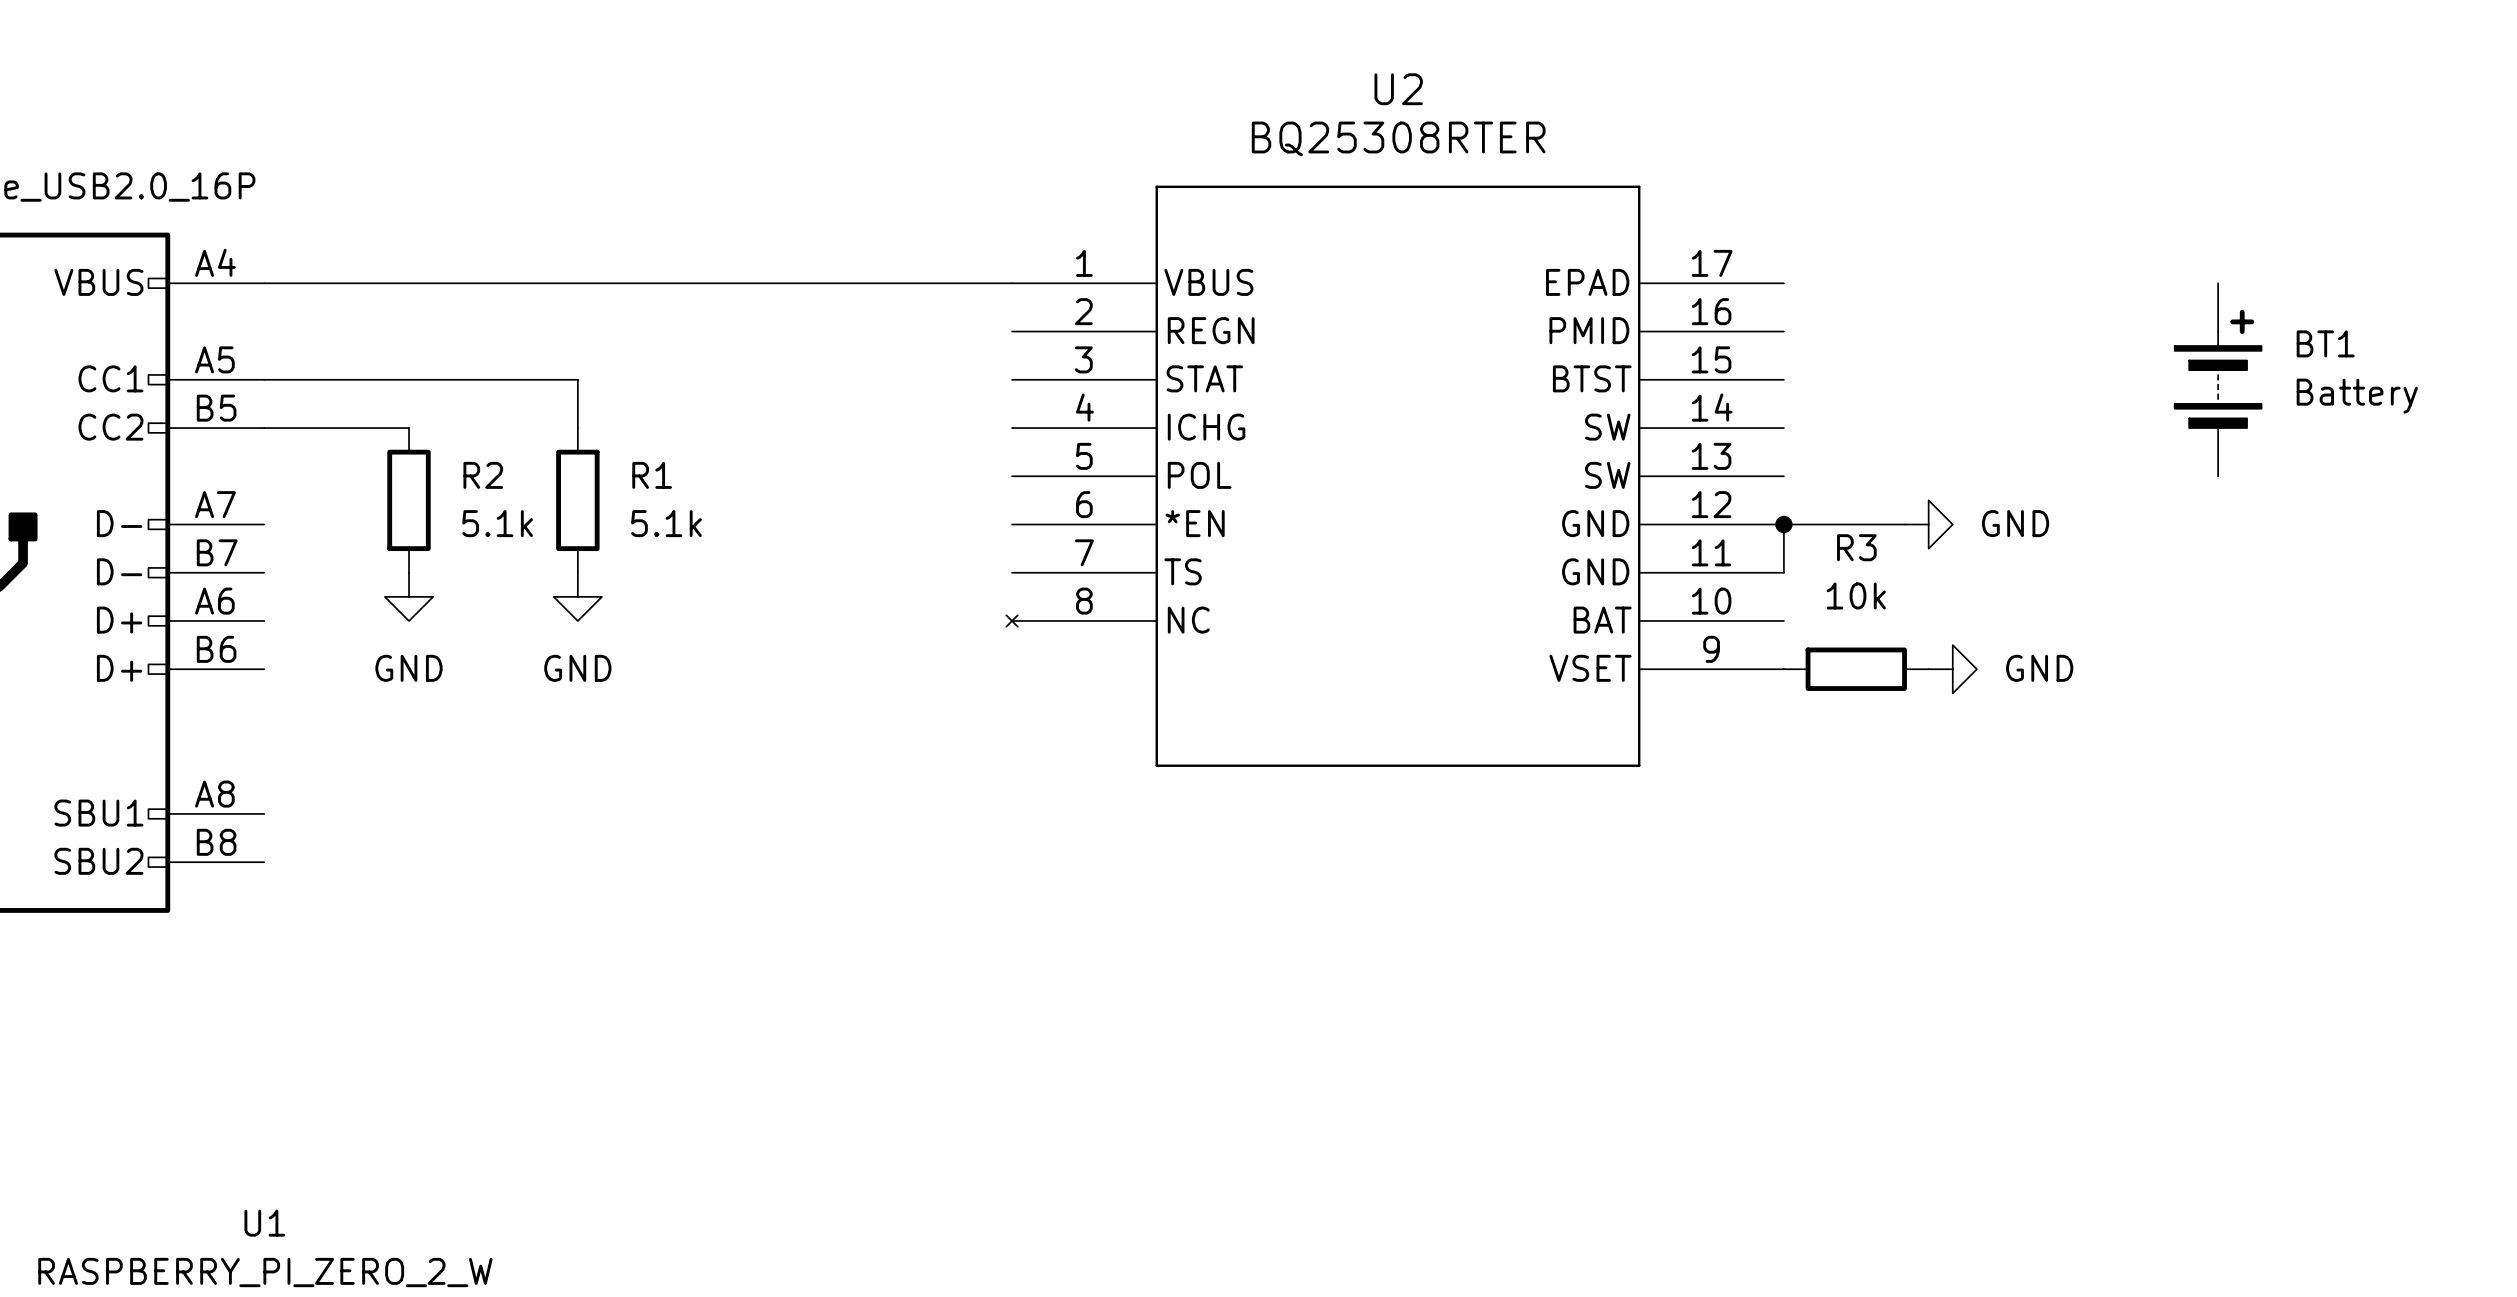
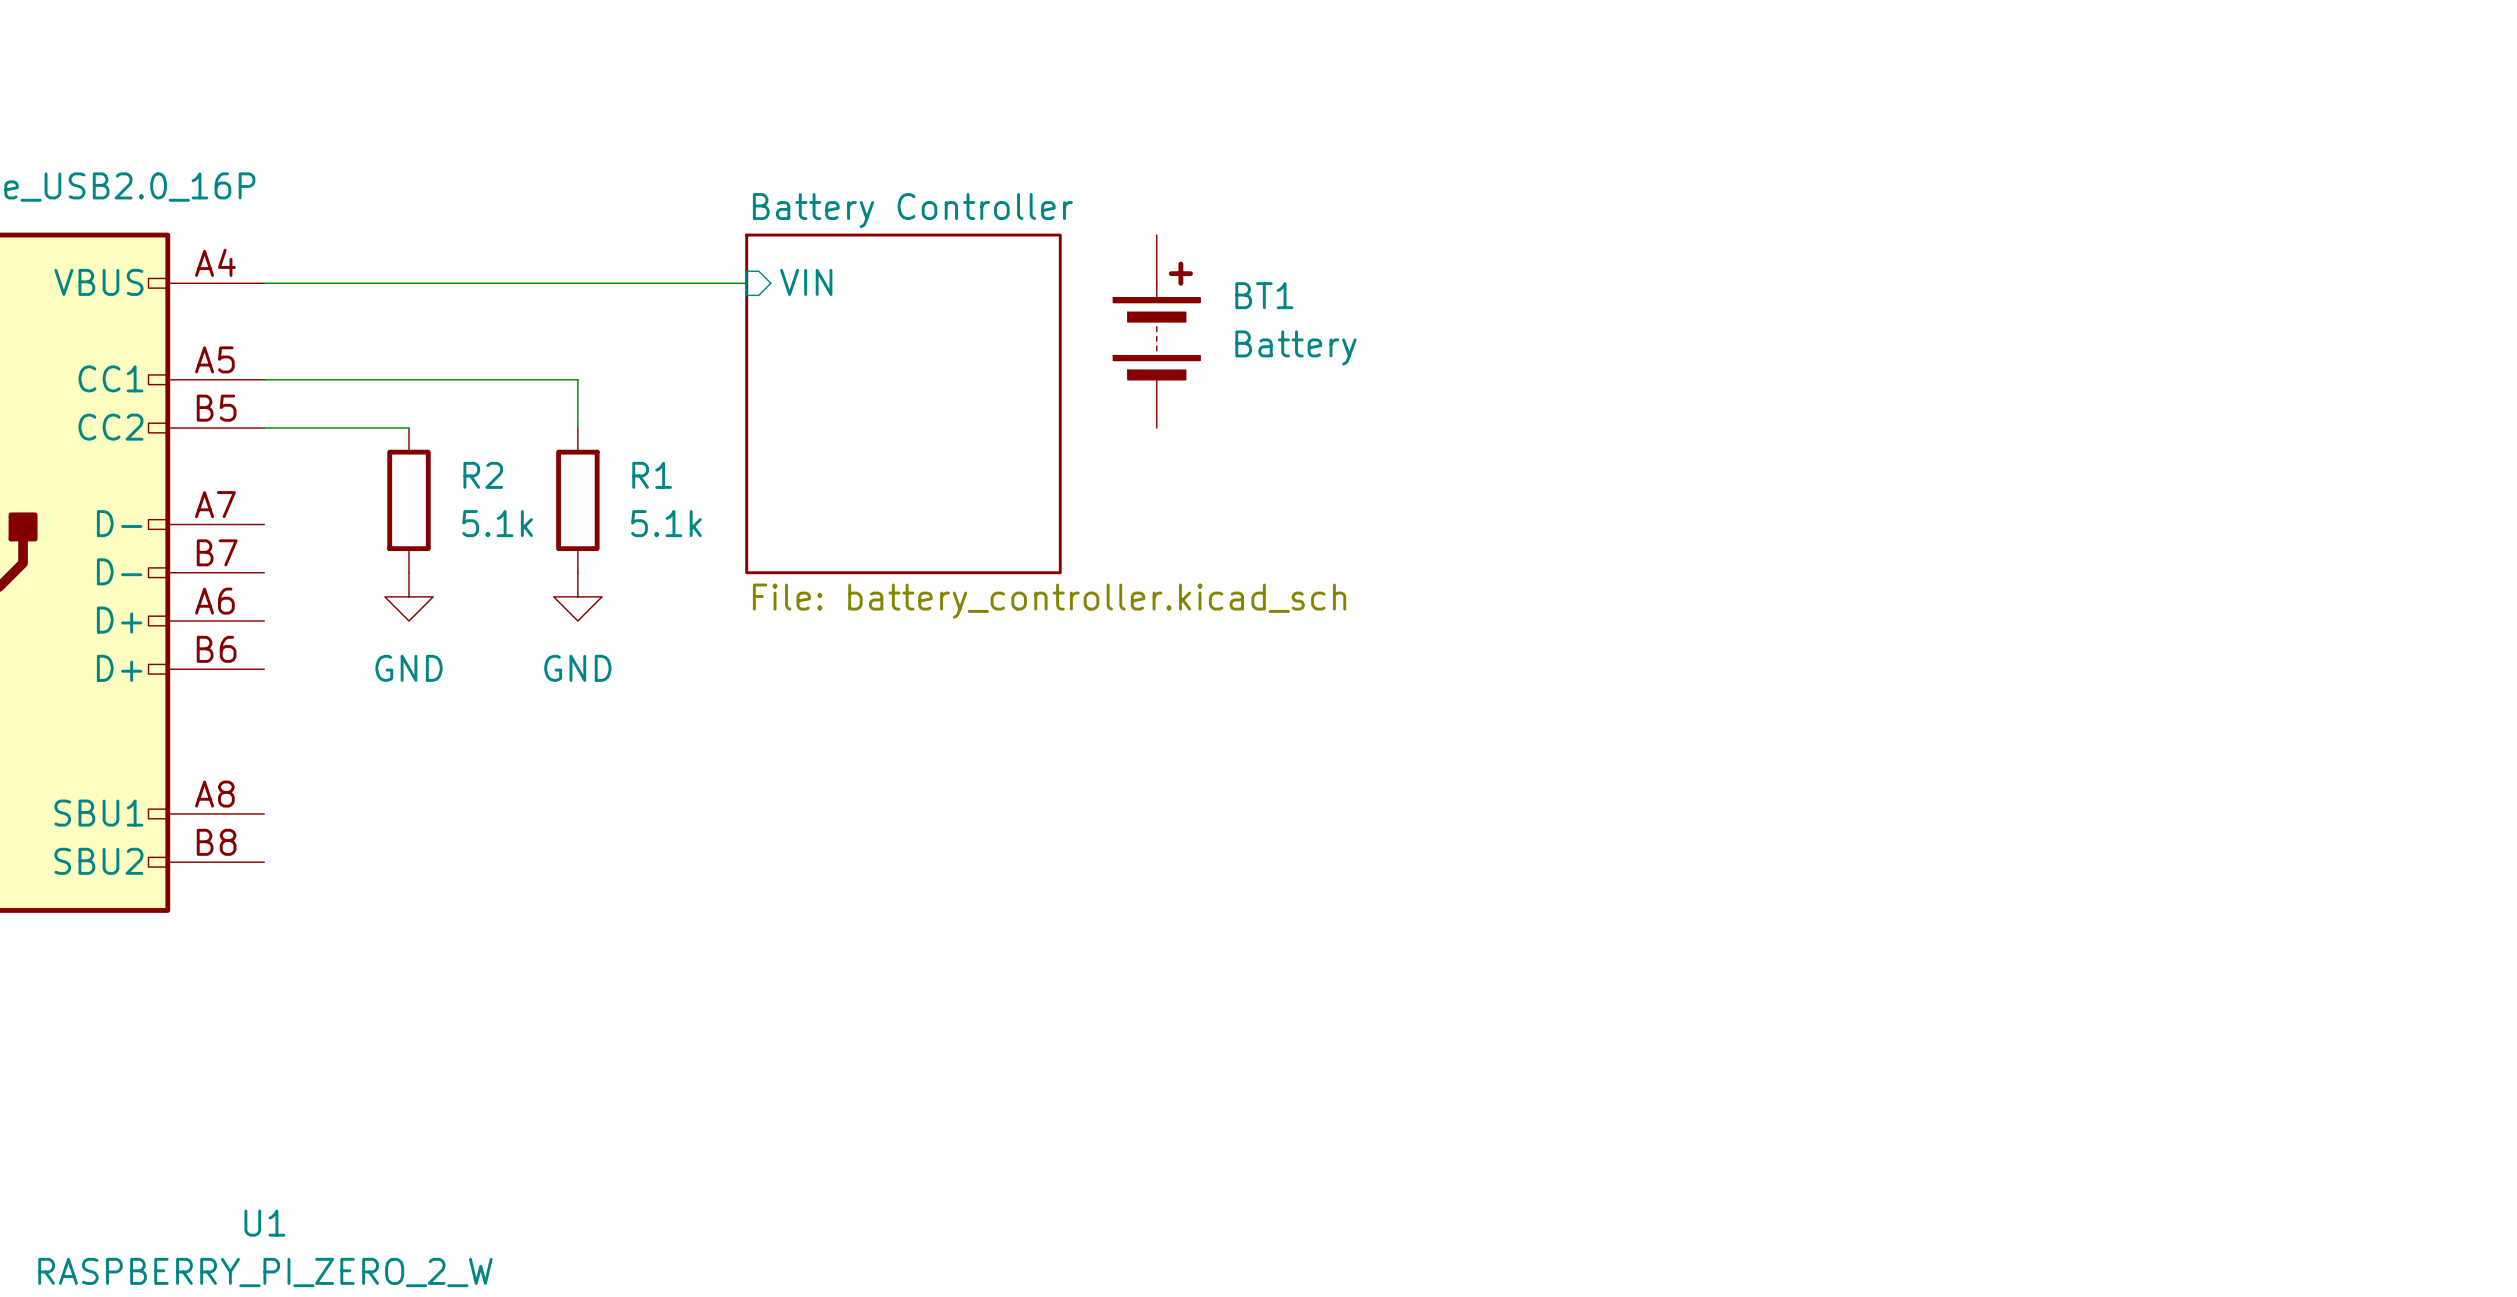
sheet pin: none -> VIN (806, 282)
wire: (746, 283) (1012, 283) -> none
BT1 position: (2218, 379) -> (1156, 331)
sheet Battery Controller: none -> File: battery_controller.kicad_sch (903, 403)
U2: BQ25308RTER (1395, 476) -> none
junction: (1783, 524) -> none
wire: (1904, 524) (1783, 524) (1783, 572) -> none
power symbol: GND (1928, 524) -> none
R3: 10k (1856, 669) -> none
power symbol: GND (1952, 669) -> none

